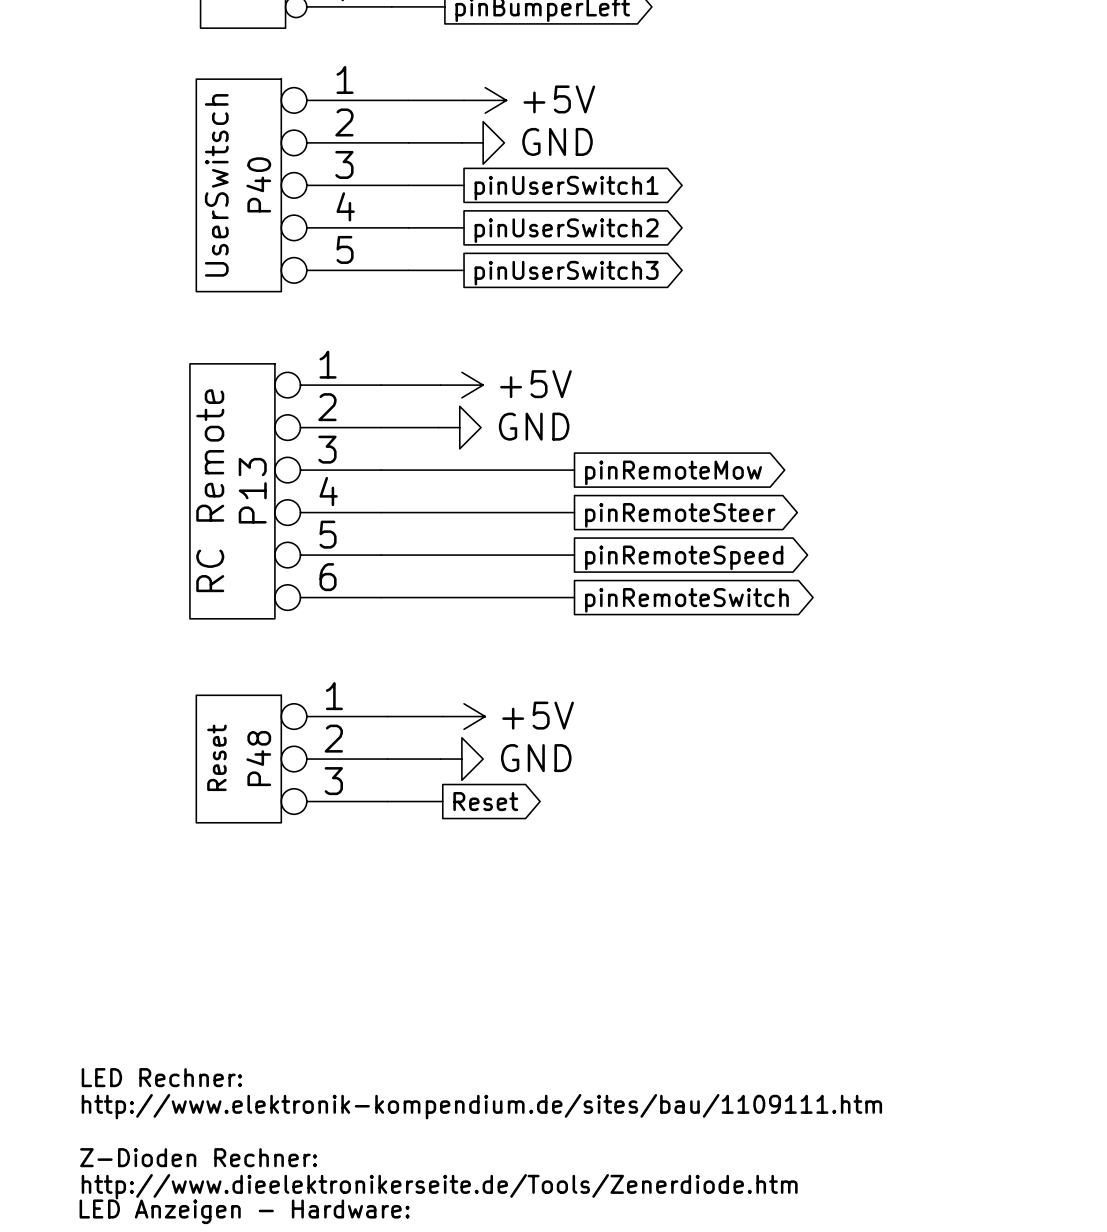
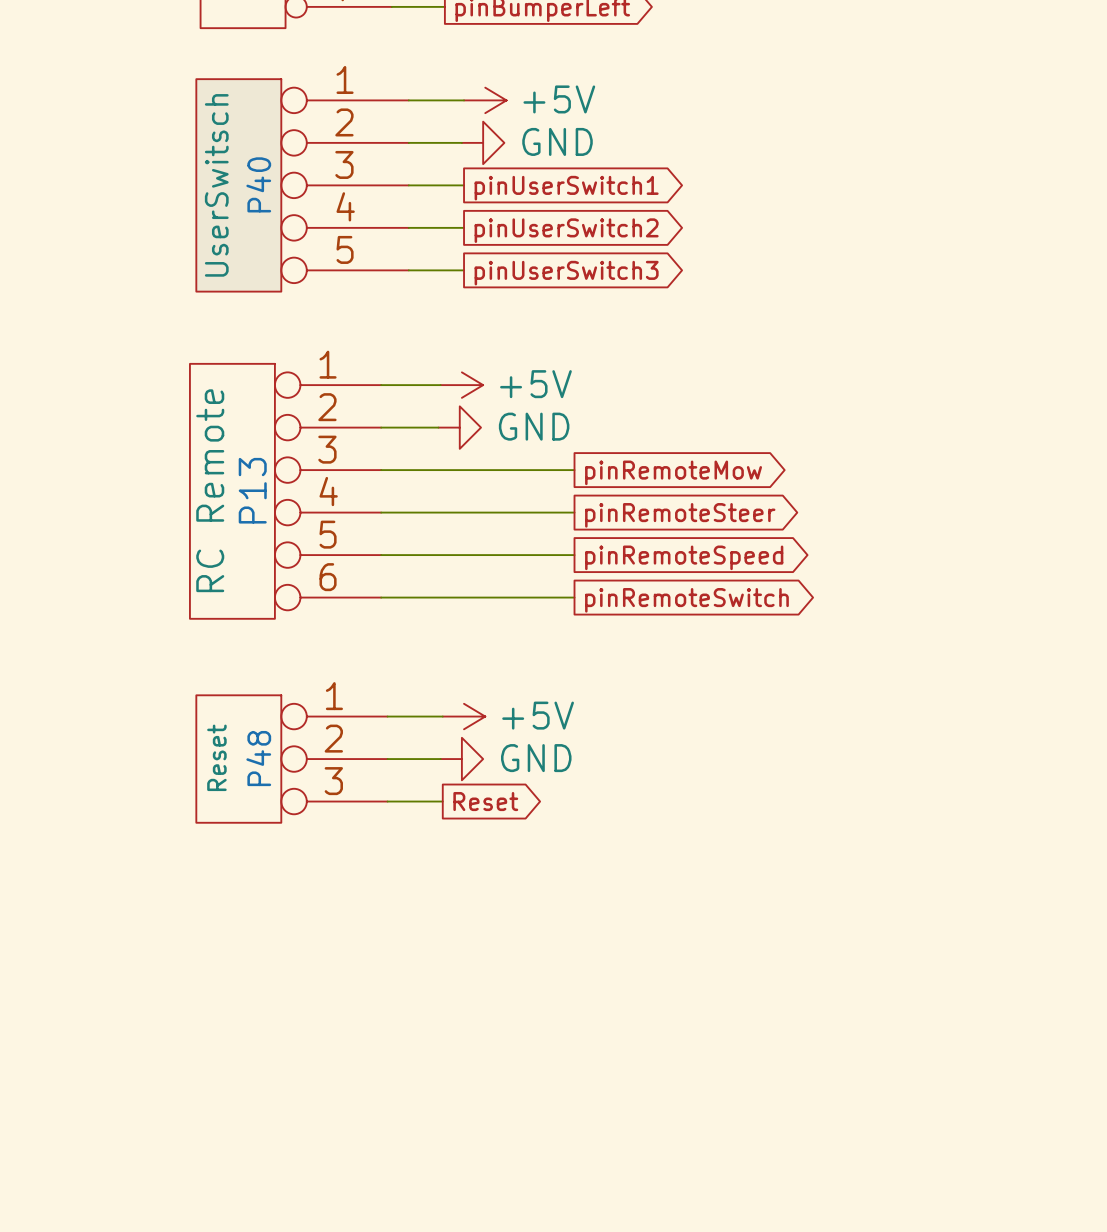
text: LED Rechner: (161, 1077) -> none
text: http://www.elektronik-kompendium.de/sites/bau/1109111.htm (481, 1106) -> none
text: Z-Dioden Rechner: (198, 1157) -> none
text: http://www.dieelektronikerseite.de/Tools/Zenerdiode.htm (439, 1186) -> none
text: LED Anzeigen - Hardware: (244, 1211) -> none

